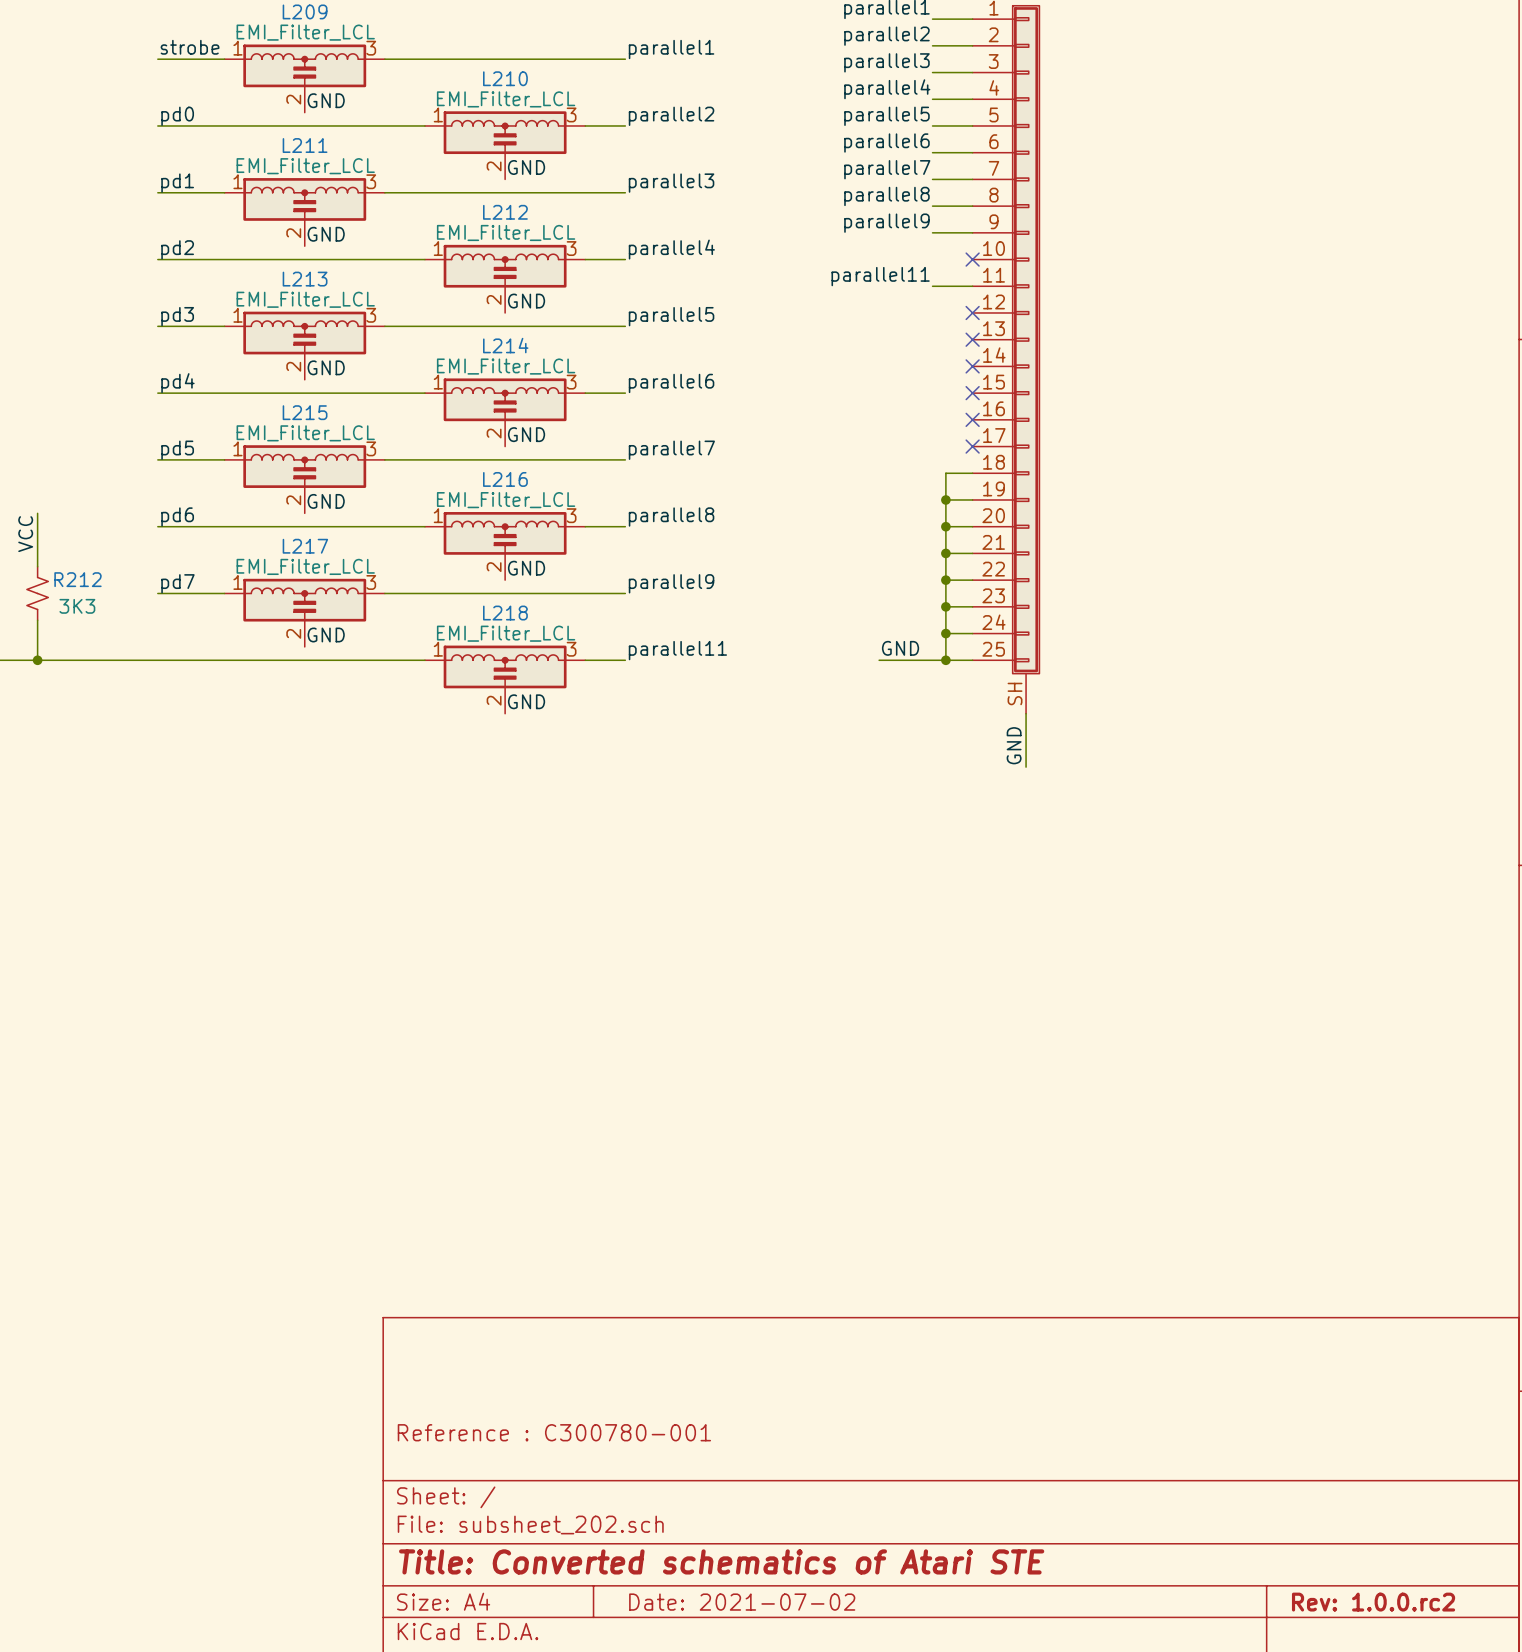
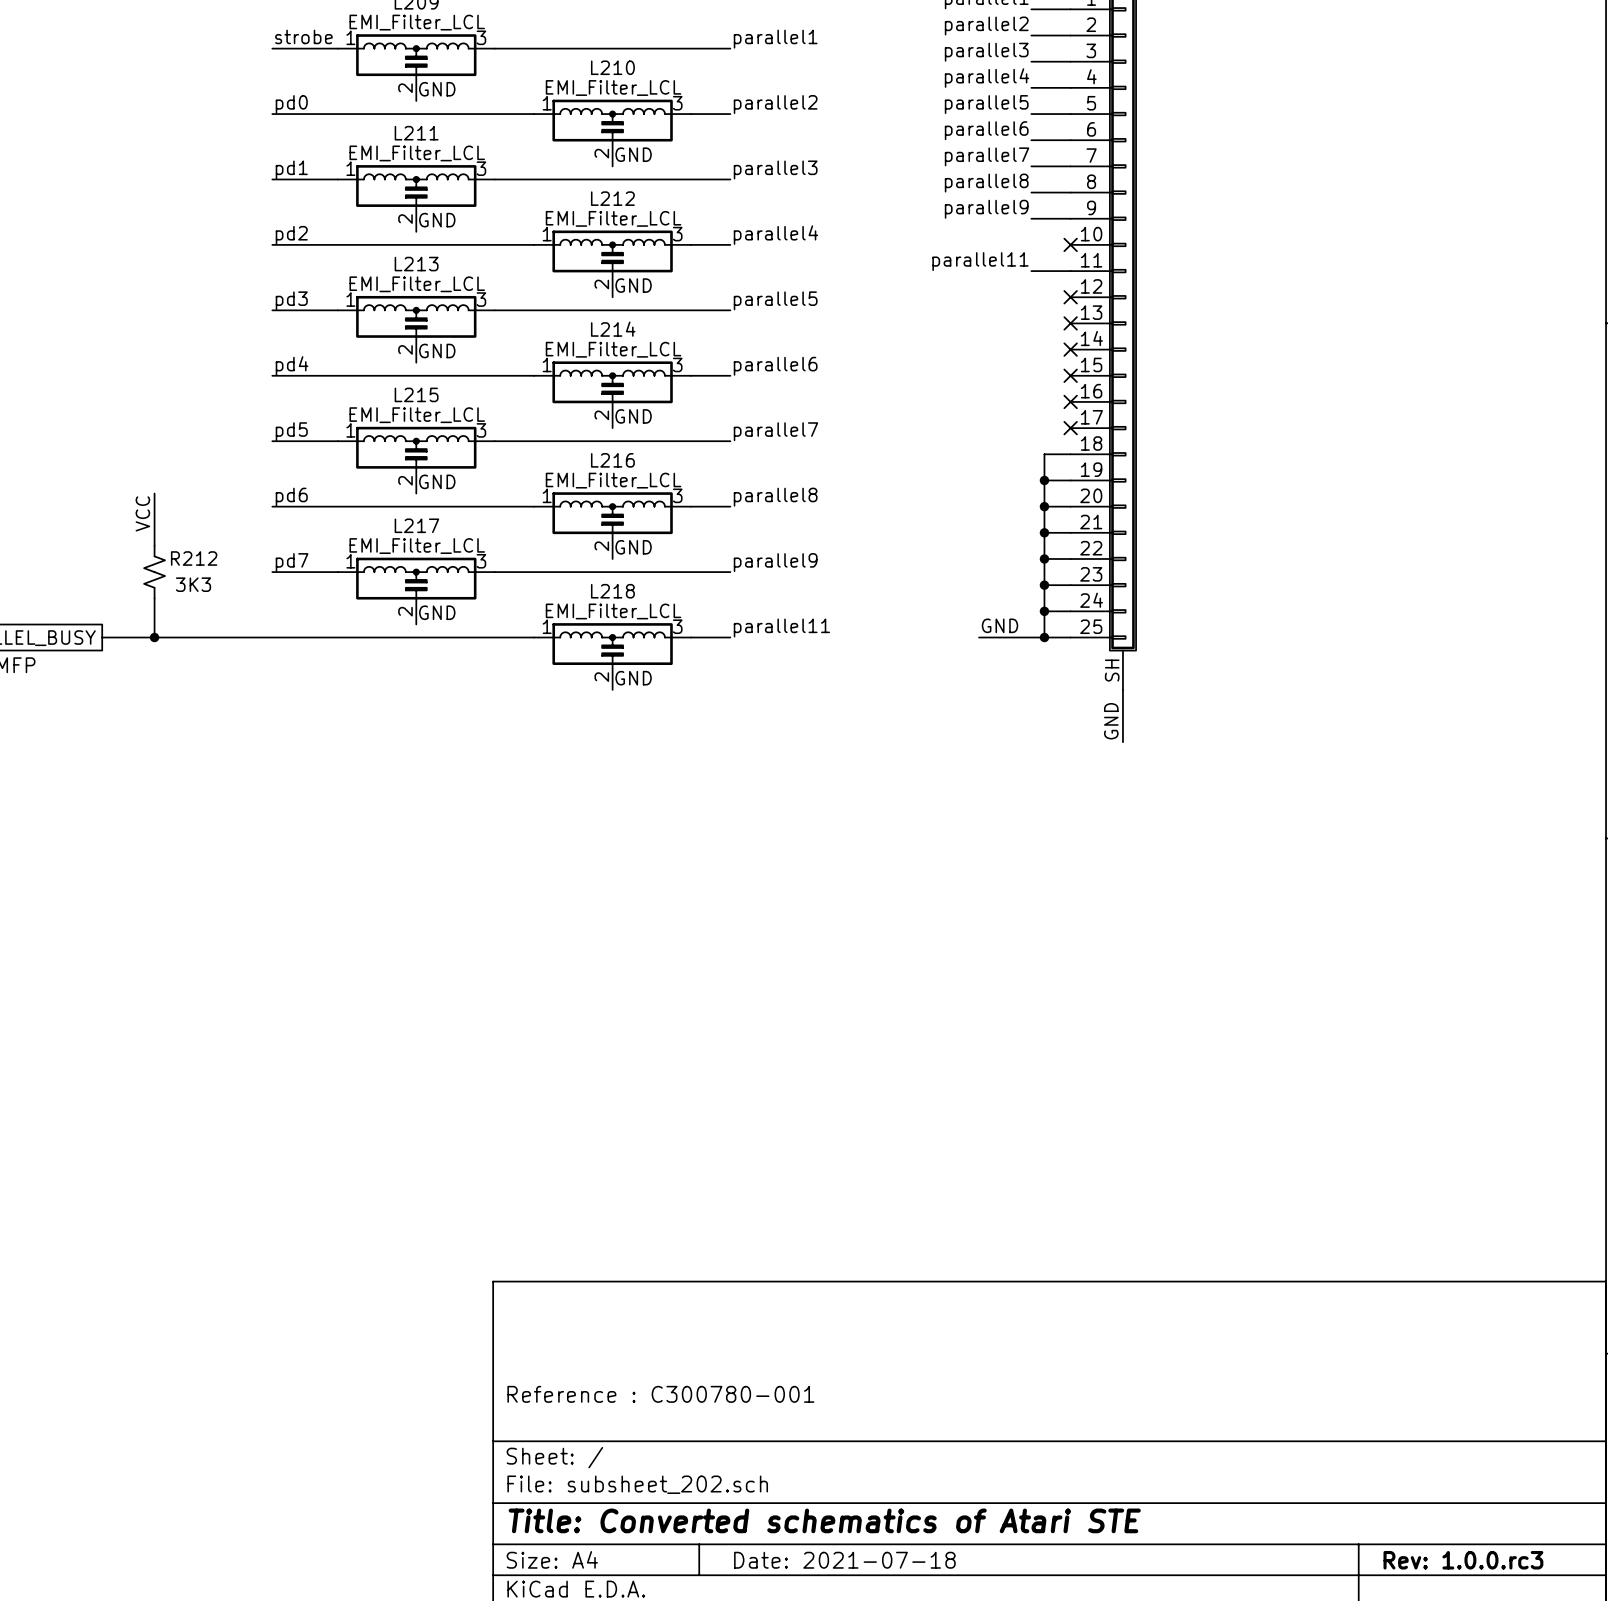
title block: Date: 2021-07-02 (742, 1602) -> Date: 2021-07-18 (844, 1560)
title block: Rev: 1.0.0.rc2 (1373, 1602) -> Rev: 1.0.0.rc3 (1463, 1560)

